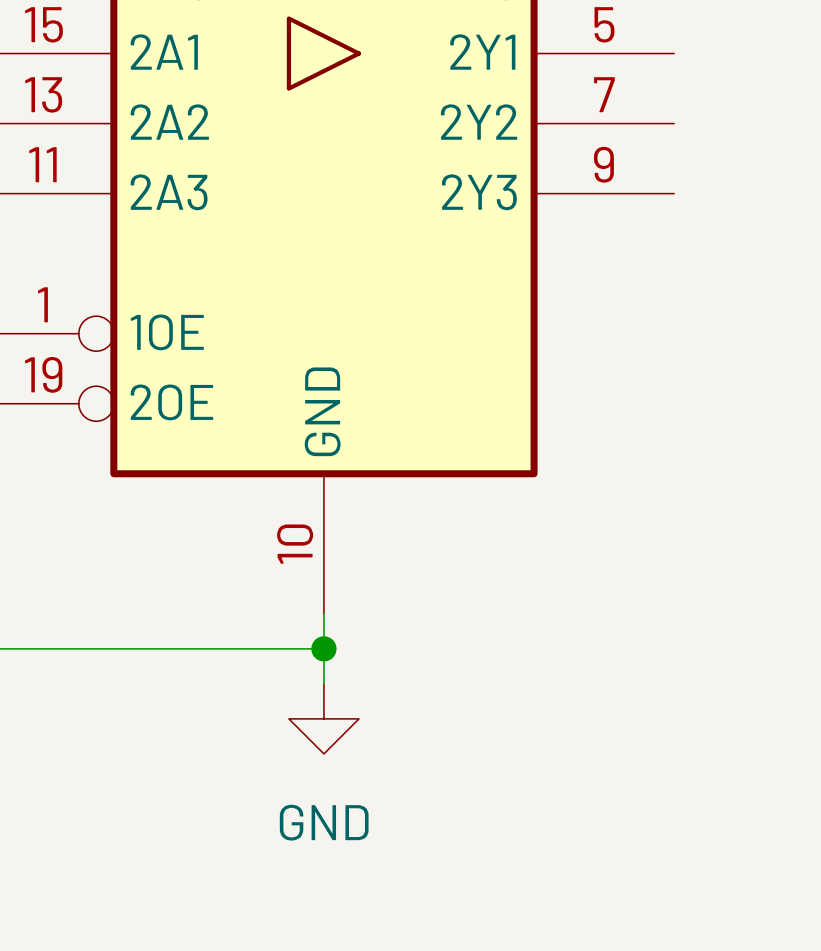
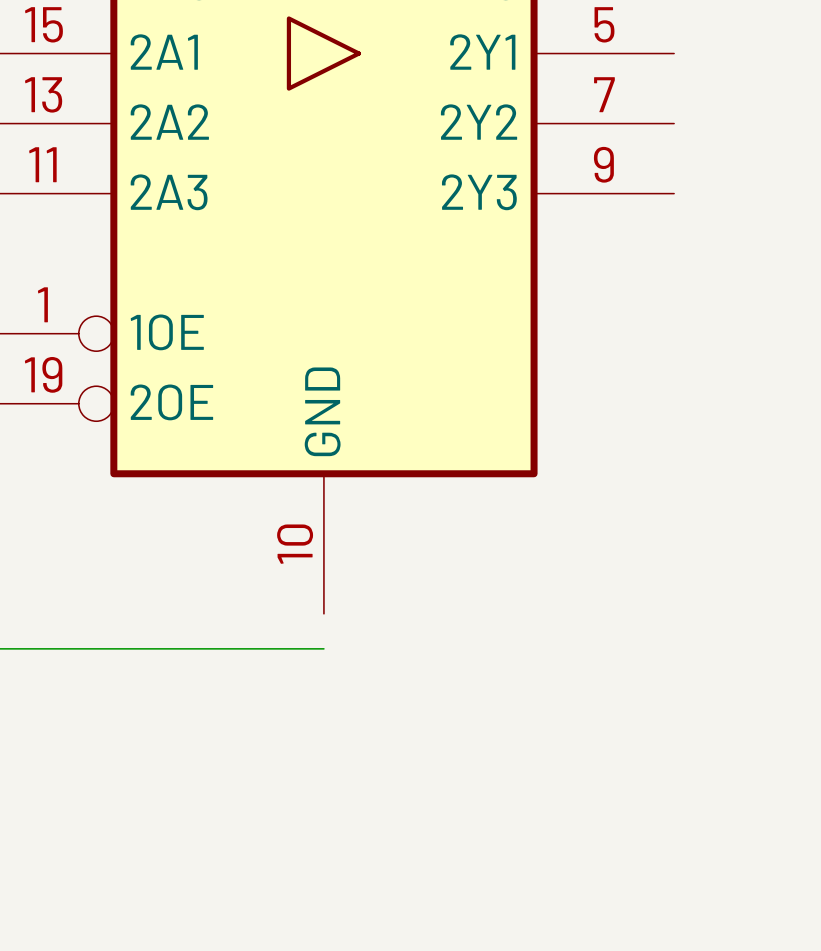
wire: (323, 613) (323, 683) -> none
junction: (323, 648) -> none
power symbol: GND (323, 718) -> none

